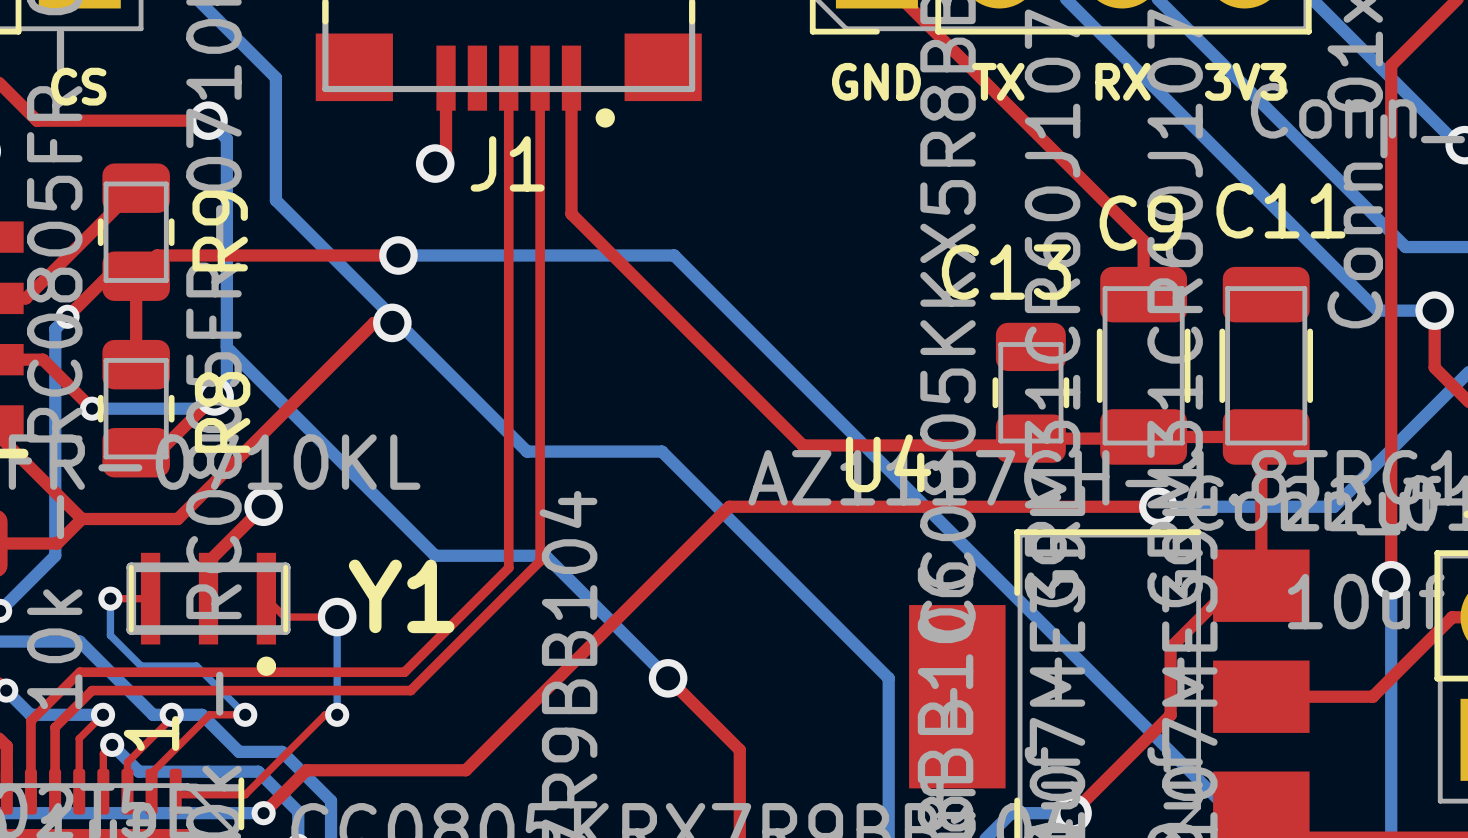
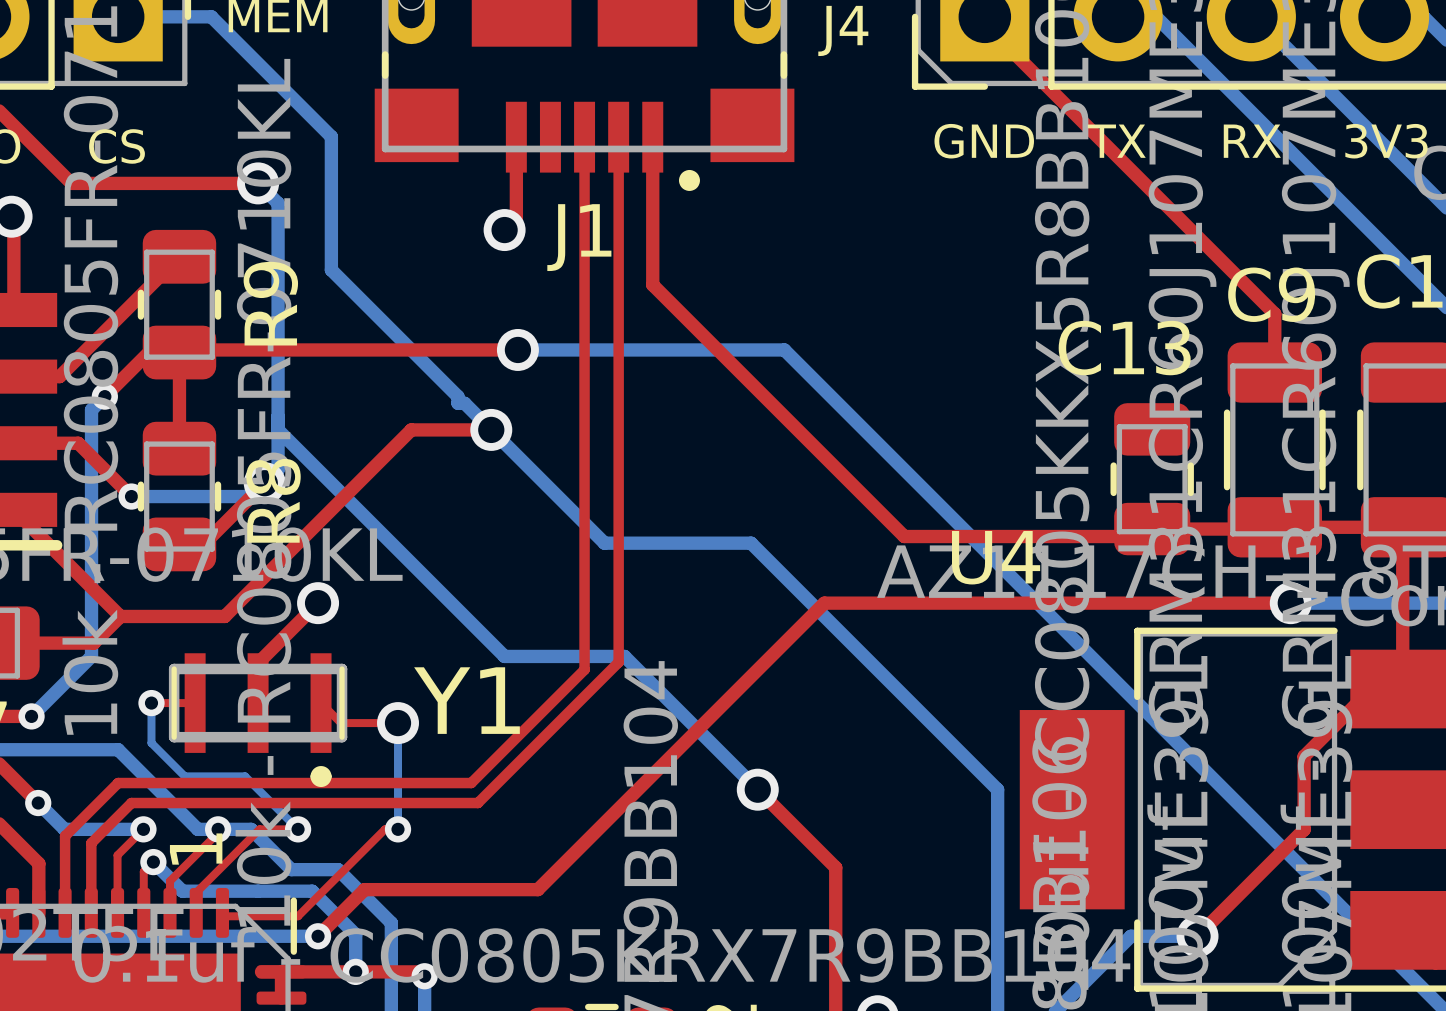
top track: (398, 255) (156, 255) (138, 273) -> (517, 349) (182, 349)
bottom track: (398, 255) (674, 255) (692, 273) -> (517, 349) (784, 349)
via: (398, 255) -> none
via: none -> (517, 349)
top track: (392, 322) (373, 322) (349, 347) -> (491, 429) (411, 429)
via position: (392, 322) -> (491, 429)

